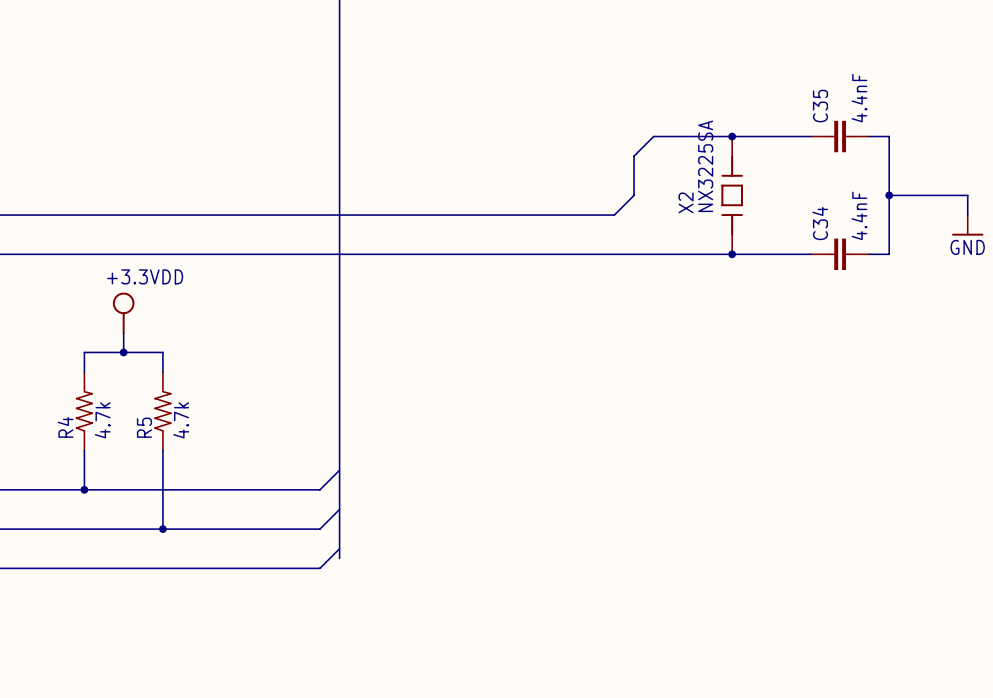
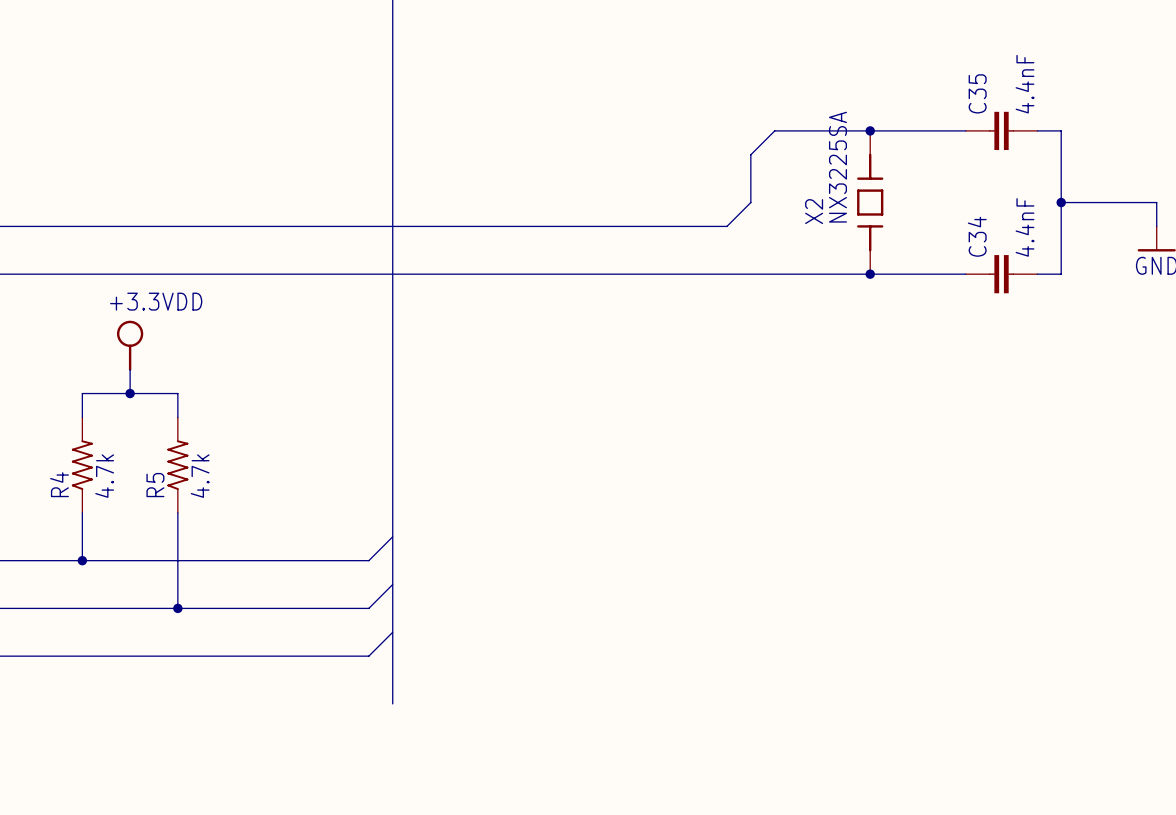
bus: none -> (392, 644) (392, 703)

